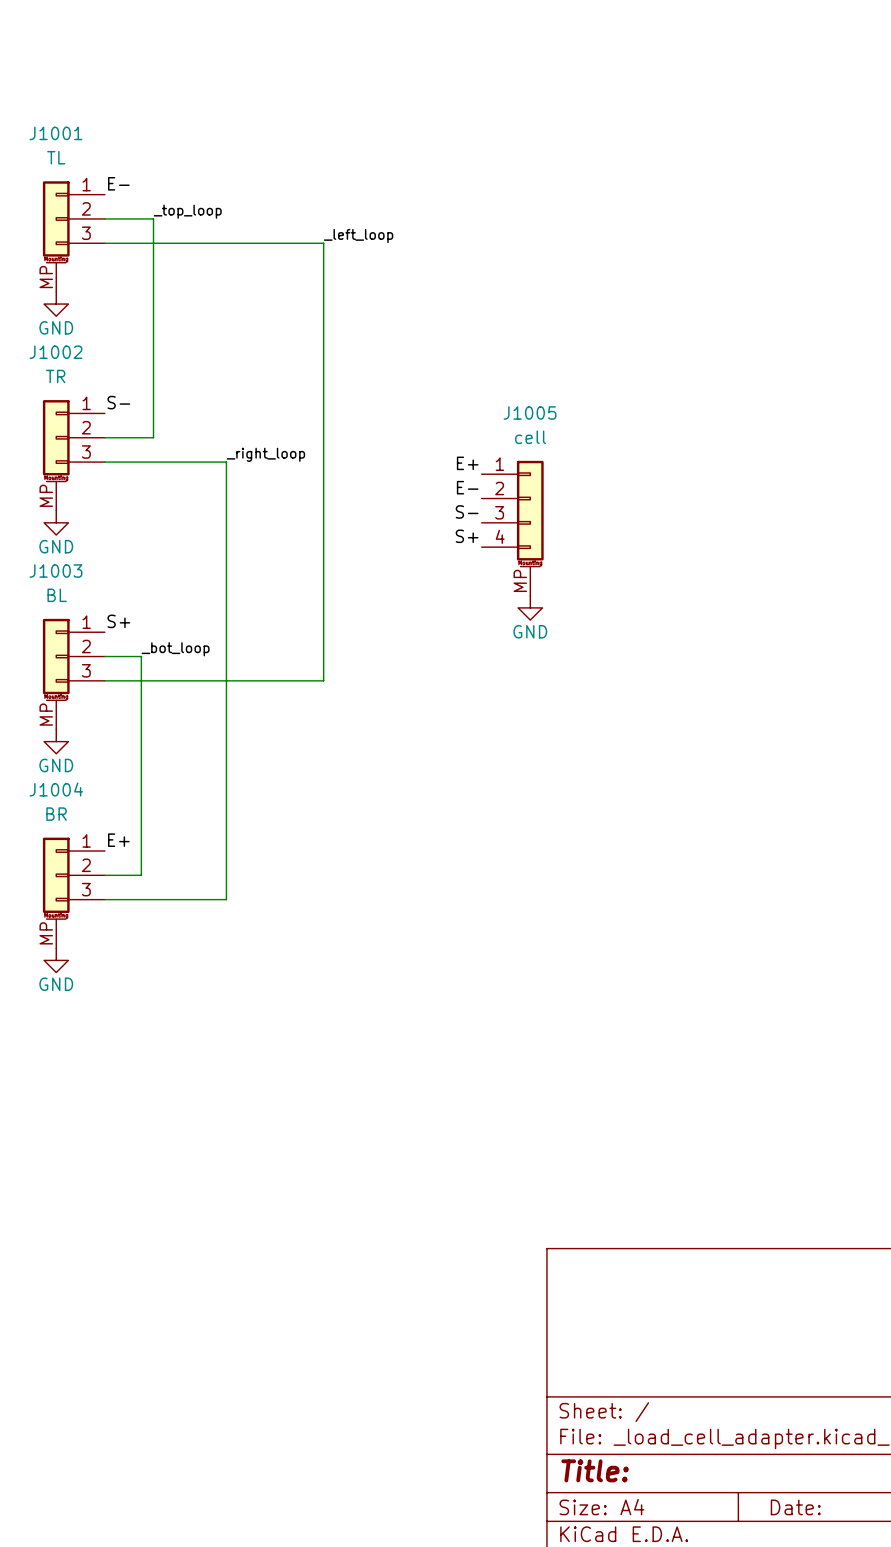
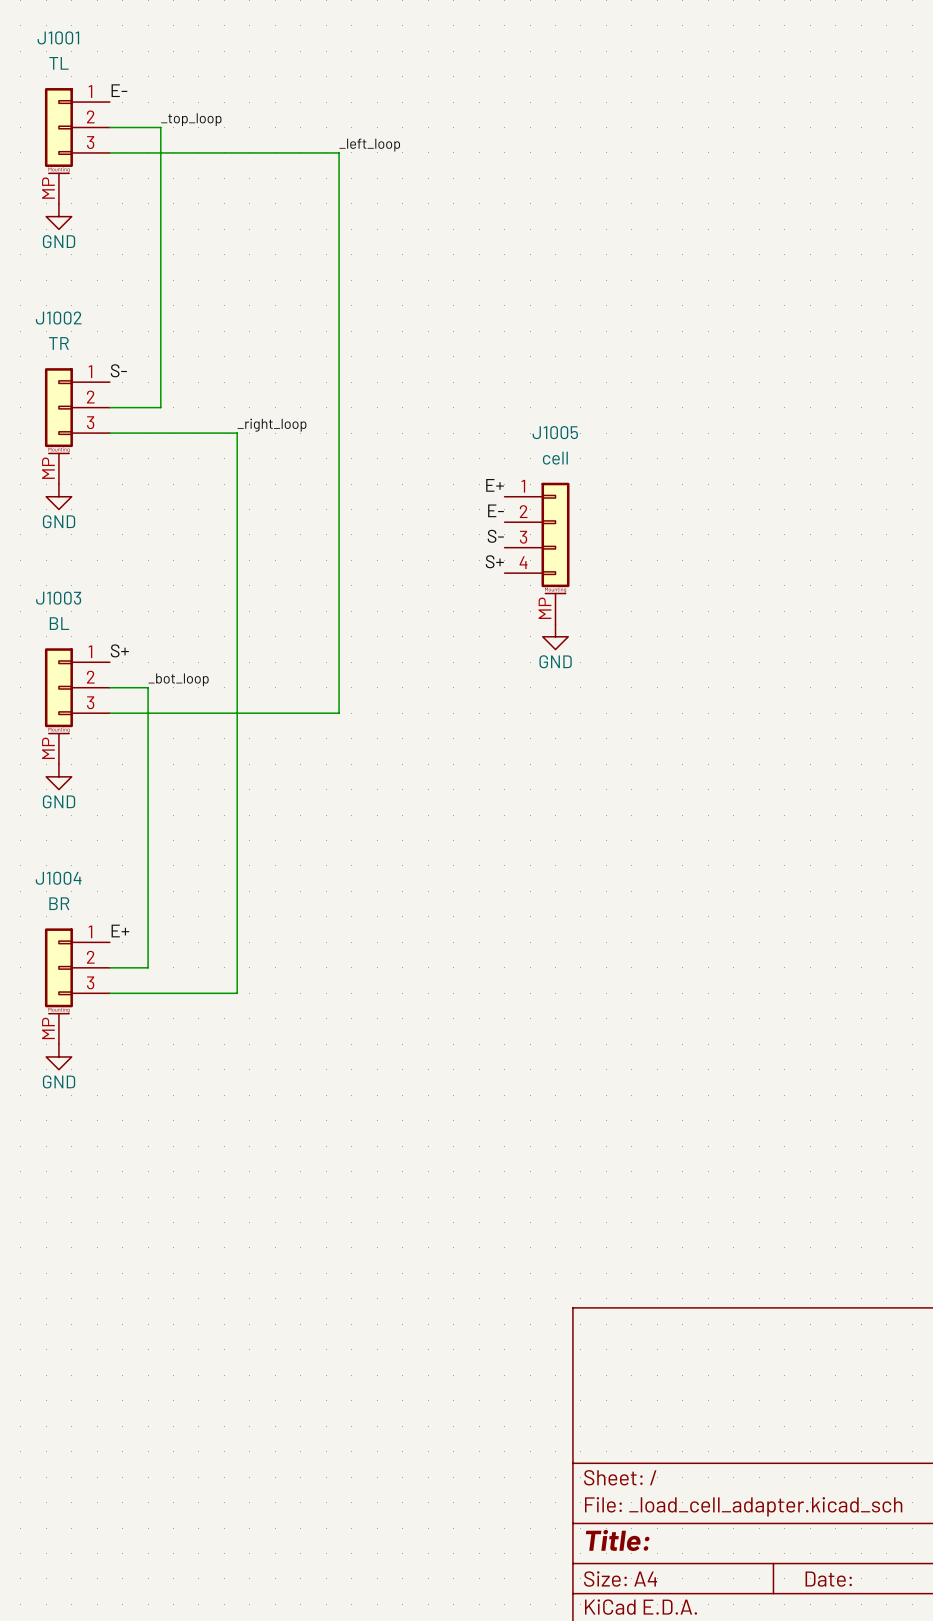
label position: E- (118, 183) -> E- (119, 90)
power symbol: none -> GND (58, 216)
label position: _top_loop (187, 211) -> _top_loop (191, 119)
wire: (104, 218) (153, 218) -> (109, 127) (160, 127) (160, 229)
J1001 position: (73, 236) -> (77, 145)
label position: _left_loop (358, 236) -> _left_loop (369, 145)
wire: (104, 243) (323, 243) -> (109, 152) (339, 152) (339, 254)
power symbol: GND (56, 304) -> none
wire: (153, 389) (153, 437) (104, 437) -> (160, 407) (109, 407)
label position: S- (118, 402) -> S- (118, 370)
label position: _right_loop (265, 454) -> _right_loop (272, 425)
J1002 position: (73, 455) -> (77, 426)
wire: (104, 462) (226, 462) -> (109, 433) (237, 433) (237, 484)
power symbol position: GND (56, 522) -> GND (58, 496)
label position: E+ (118, 840) -> E+ (120, 931)
wire: (104, 875) (141, 875) -> (109, 967) (148, 967) (148, 916)
J1004 position: (73, 892) -> (77, 986)
wire: (104, 899) (226, 899) -> (109, 993) (237, 993) (237, 942)
power symbol position: GND (56, 960) -> GND (58, 1056)

